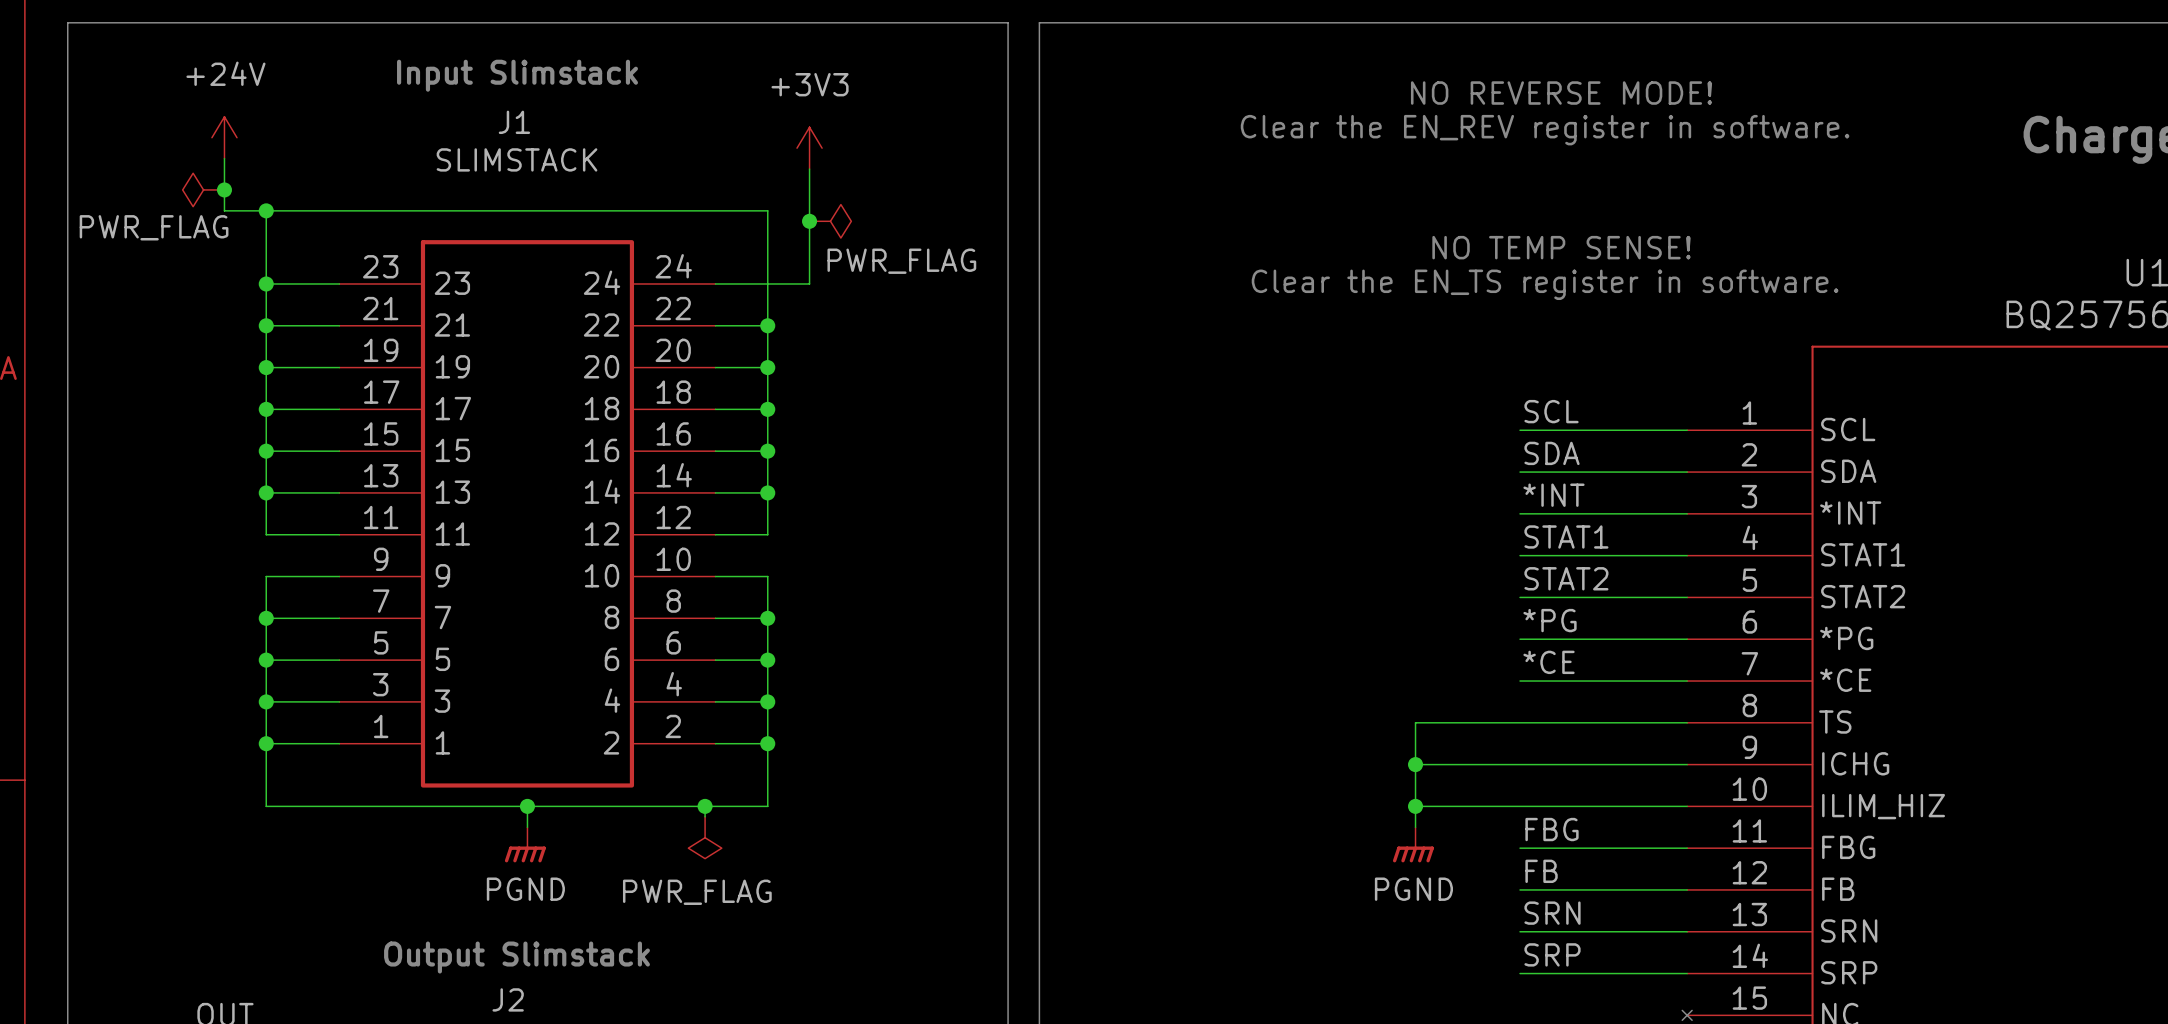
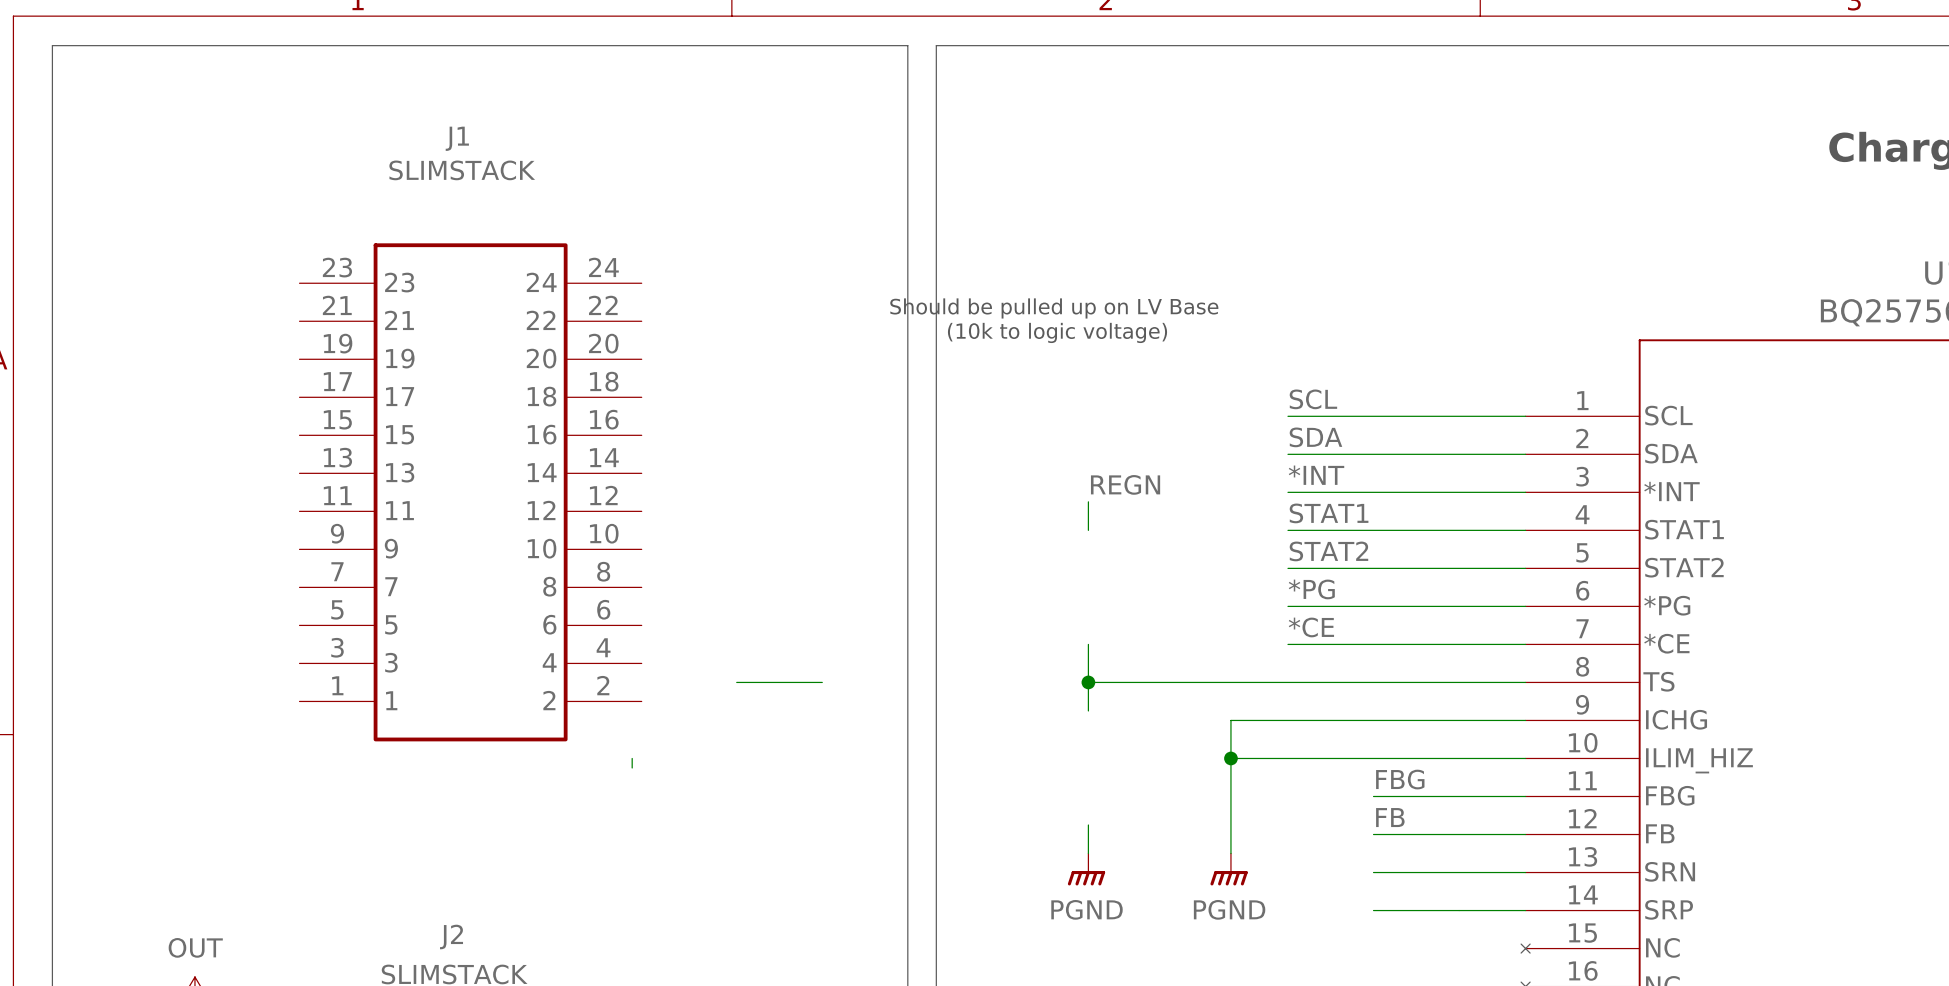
text: Input Slimstack (517, 75) -> none
text: NO REVERSE MODE! (1561, 93) -> none
text: Clear the EN_REV register in software. (1545, 130) -> none
power symbol: +24V (224, 137) -> none
power symbol: +3V3 (809, 148) -> none
wire: (224, 158) (224, 210) (767, 210) (767, 534) (715, 534) -> none
wire: (809, 169) (809, 283) (715, 283) -> none
power symbol: PWR_FLAG (203, 189) -> none
junction: (224, 189) -> none
wire: (266, 210) (266, 534) (339, 534) -> none
junction: (266, 210) -> none
junction: (809, 221) -> none
power symbol: PWR_FLAG (830, 221) -> none
text: NO TEMP SENSE! (1561, 247) -> none
wire: (266, 283) (339, 283) -> none
junction: (266, 283) -> none
text: Clear the EN_TS register in software. (1545, 284) -> none
text: none -> Should be pulled up on LV Base (1054, 308)
wire: (266, 325) (339, 325) -> none
junction: (266, 325) -> none
wire: (715, 325) (767, 325) -> none
junction: (767, 325) -> none
text: none -> (10k to logic voltage) (1057, 332)
wire: (266, 367) (339, 367) -> none
junction: (266, 367) -> none
wire: (715, 367) (767, 367) -> none
junction: (767, 367) -> none
wire: (266, 409) (339, 409) -> none
junction: (266, 409) -> none
wire: (715, 409) (767, 409) -> none
junction: (767, 409) -> none
label position: SCL (1551, 411) -> SCL (1313, 399)
wire: none -> (1287, 416) (1373, 416)
wire: (266, 451) (339, 451) -> none
junction: (266, 451) -> none
wire: (715, 451) (767, 451) -> none
junction: (767, 451) -> none
label position: SDA (1552, 453) -> SDA (1315, 437)
wire: none -> (1287, 454) (1373, 454)
wire: (266, 492) (339, 492) -> none
junction: (266, 492) -> none
wire: (715, 492) (767, 492) -> none
junction: (767, 492) -> none
label position: *INT (1553, 495) -> *INT (1316, 475)
label: none -> REGN (1125, 484)
wire: none -> (1287, 492) (1373, 492)
wire: none -> (1088, 501) (1088, 530)
label position: STAT1 (1566, 536) -> STAT1 (1329, 513)
wire: none -> (1287, 530) (1373, 530)
wire: (339, 576) (266, 576) (266, 806) (767, 806) (767, 576) (715, 576) -> none
label position: STAT2 (1566, 578) -> STAT2 (1328, 551)
wire: none -> (1287, 568) (1373, 568)
wire: (266, 618) (339, 618) -> none
junction: (266, 618) -> none
wire: (715, 618) (767, 618) -> none
junction: (767, 618) -> none
label position: *PG (1550, 620) -> *PG (1311, 589)
wire: none -> (1287, 606) (1373, 606)
wire: (266, 660) (339, 660) -> none
junction: (266, 660) -> none
wire: (715, 660) (767, 660) -> none
junction: (767, 660) -> none
label position: *CE (1549, 662) -> *CE (1311, 627)
wire: none -> (1088, 644) (1088, 710)
wire: none -> (1287, 644) (1373, 644)
wire: (266, 701) (339, 701) -> none
junction: (266, 701) -> none
wire: (715, 701) (767, 701) -> none
junction: (767, 701) -> none
wire: none -> (736, 682) (822, 682)
junction: none -> (1088, 682)
wire: (1415, 722) (1415, 827) -> (1278, 682) (1088, 682)
wire: (266, 743) (339, 743) -> none
junction: (266, 743) -> none
wire: (715, 743) (767, 743) -> none
junction: (767, 743) -> none
wire: none -> (1278, 720) (1230, 720) (1230, 853)
junction: (1415, 764) -> none
wire: (527, 806) (527, 827) -> none
junction: (527, 806) -> none
junction: (705, 806) -> none
wire: none -> (1230, 758) (1278, 758)
junction: none -> (1230, 758)
junction: (1415, 806) -> none
power symbol: PWR_FLAG (705, 837) -> none
power symbol: PGND (525, 844) -> none
power symbol position: PGND (1413, 844) -> PGND (1229, 869)
wire: none -> (1088, 825) (1088, 853)
label: SRN (1552, 913) -> none
power symbol: none -> PGND (1086, 869)
label: SRP (1552, 954) -> none
text: Output Slimstack (517, 957) -> none

